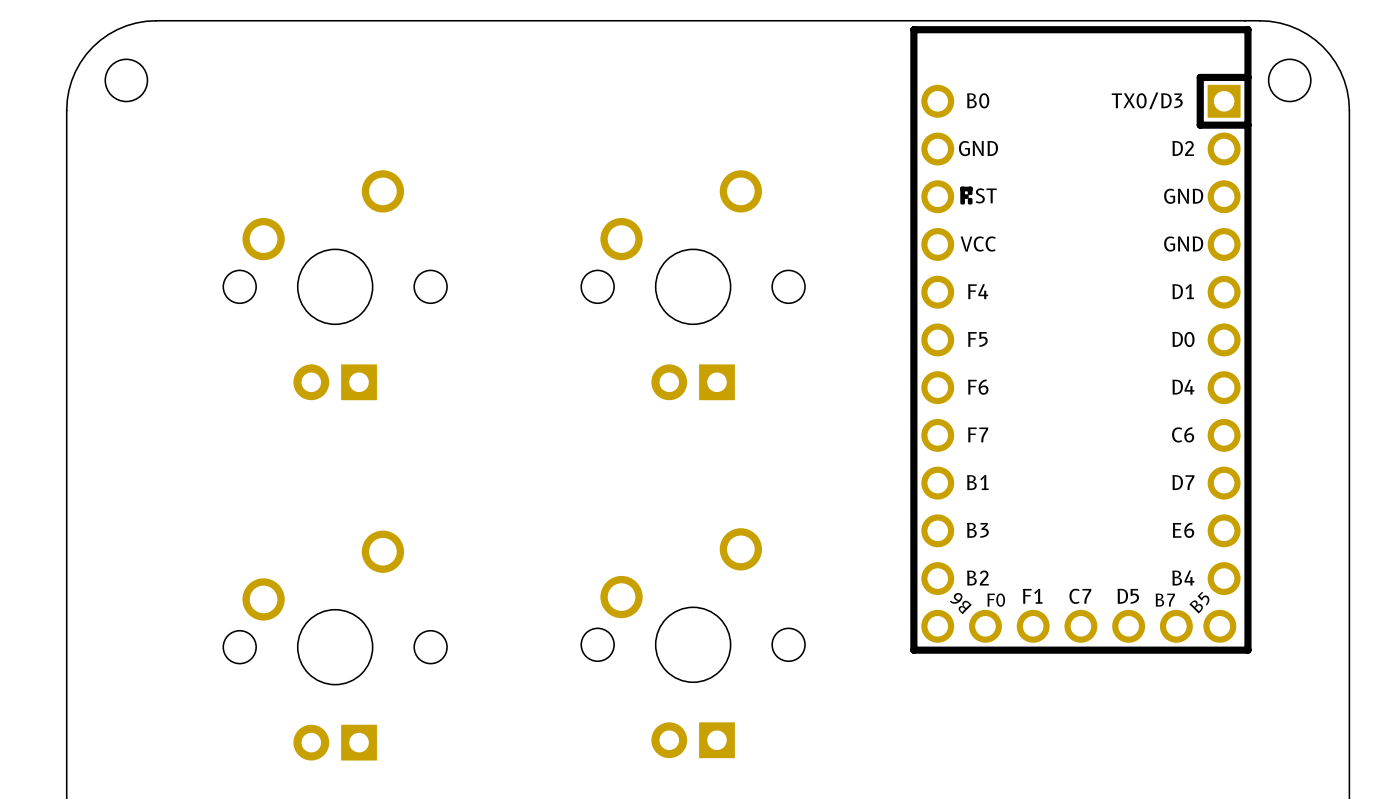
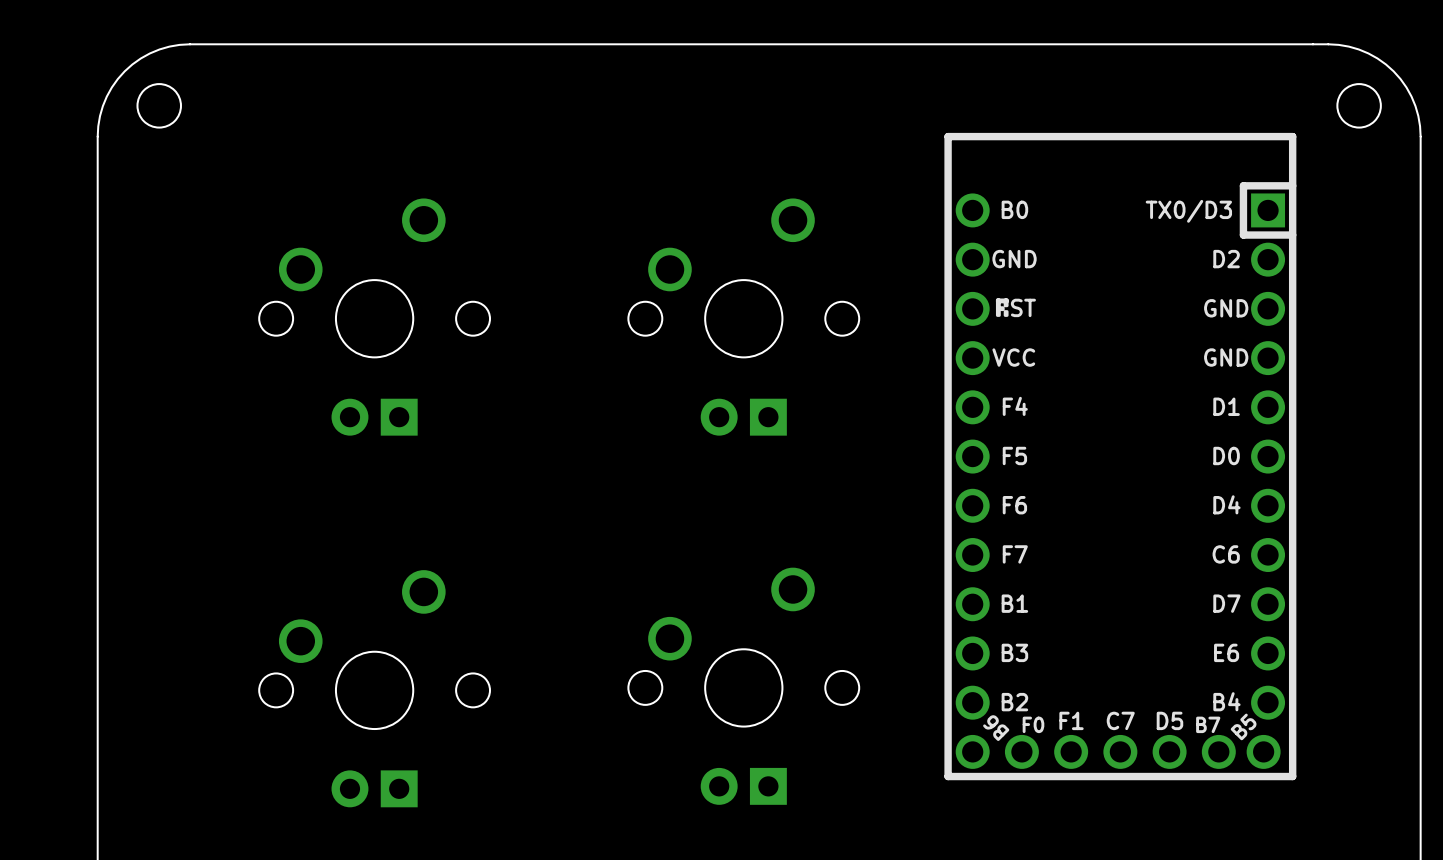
part position: (1080, 339) -> (1120, 456)

